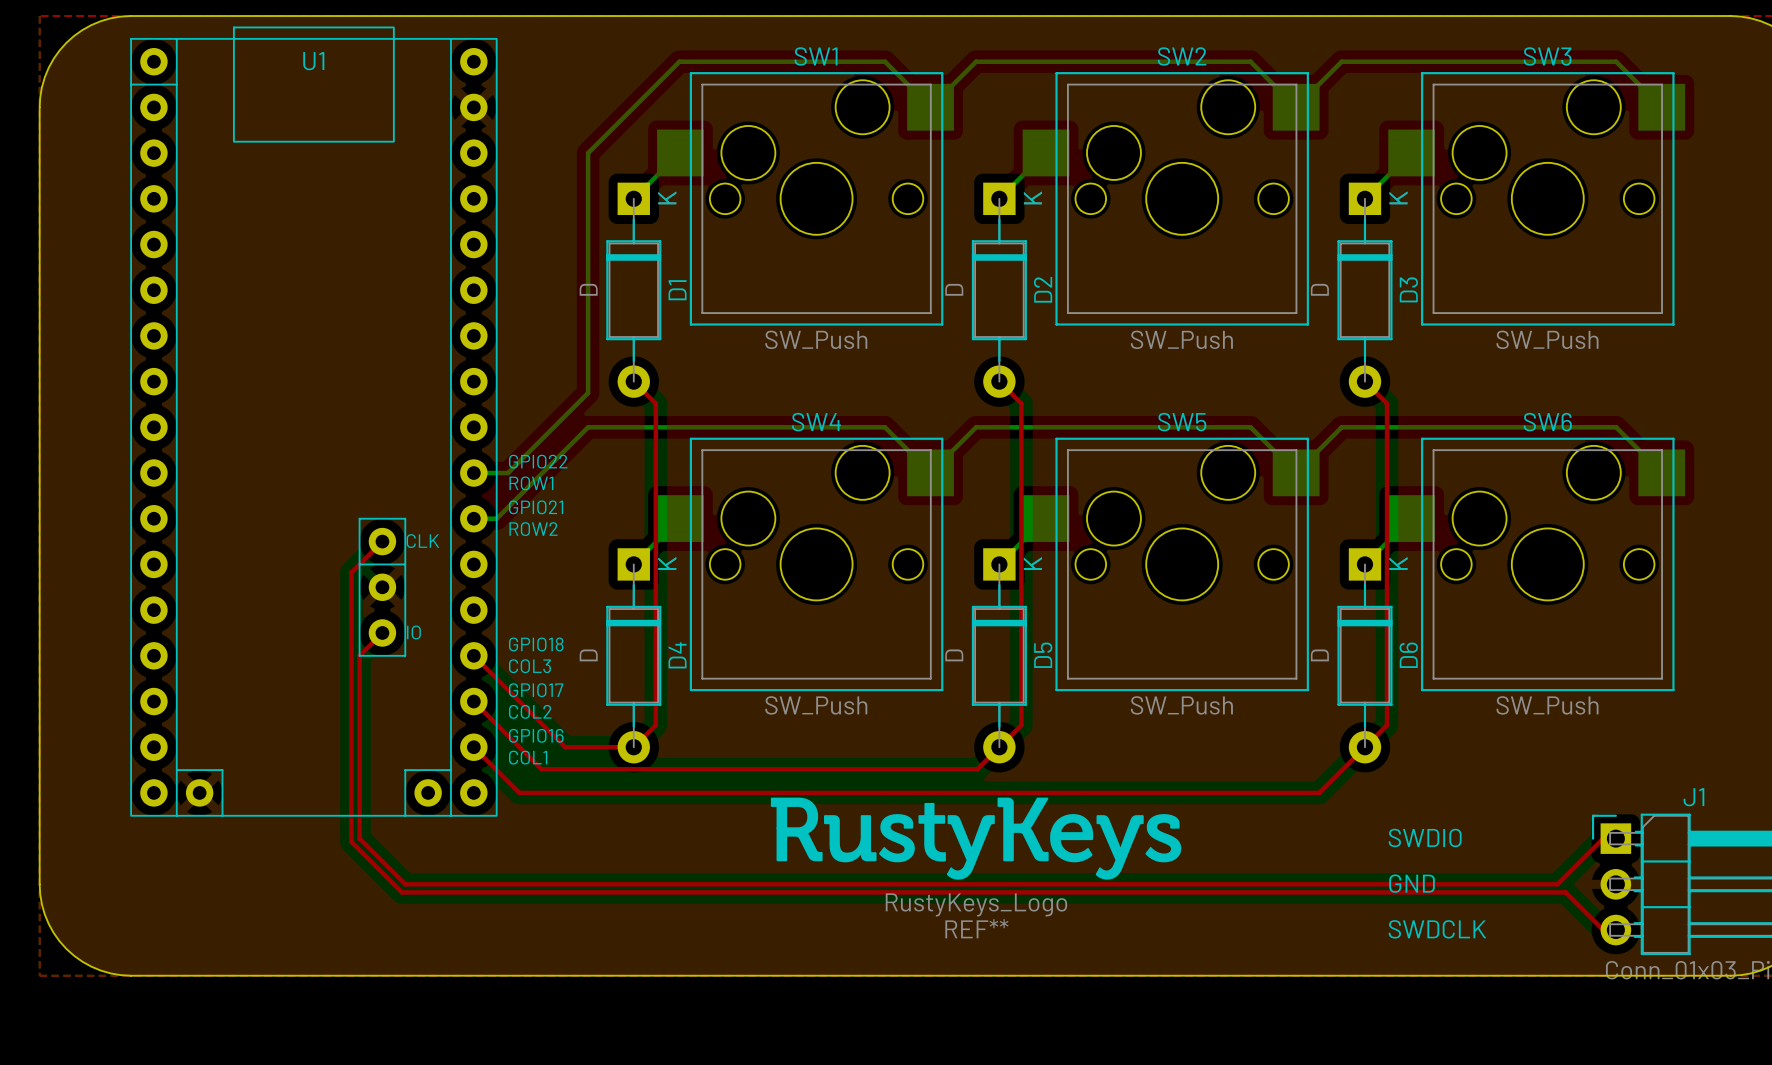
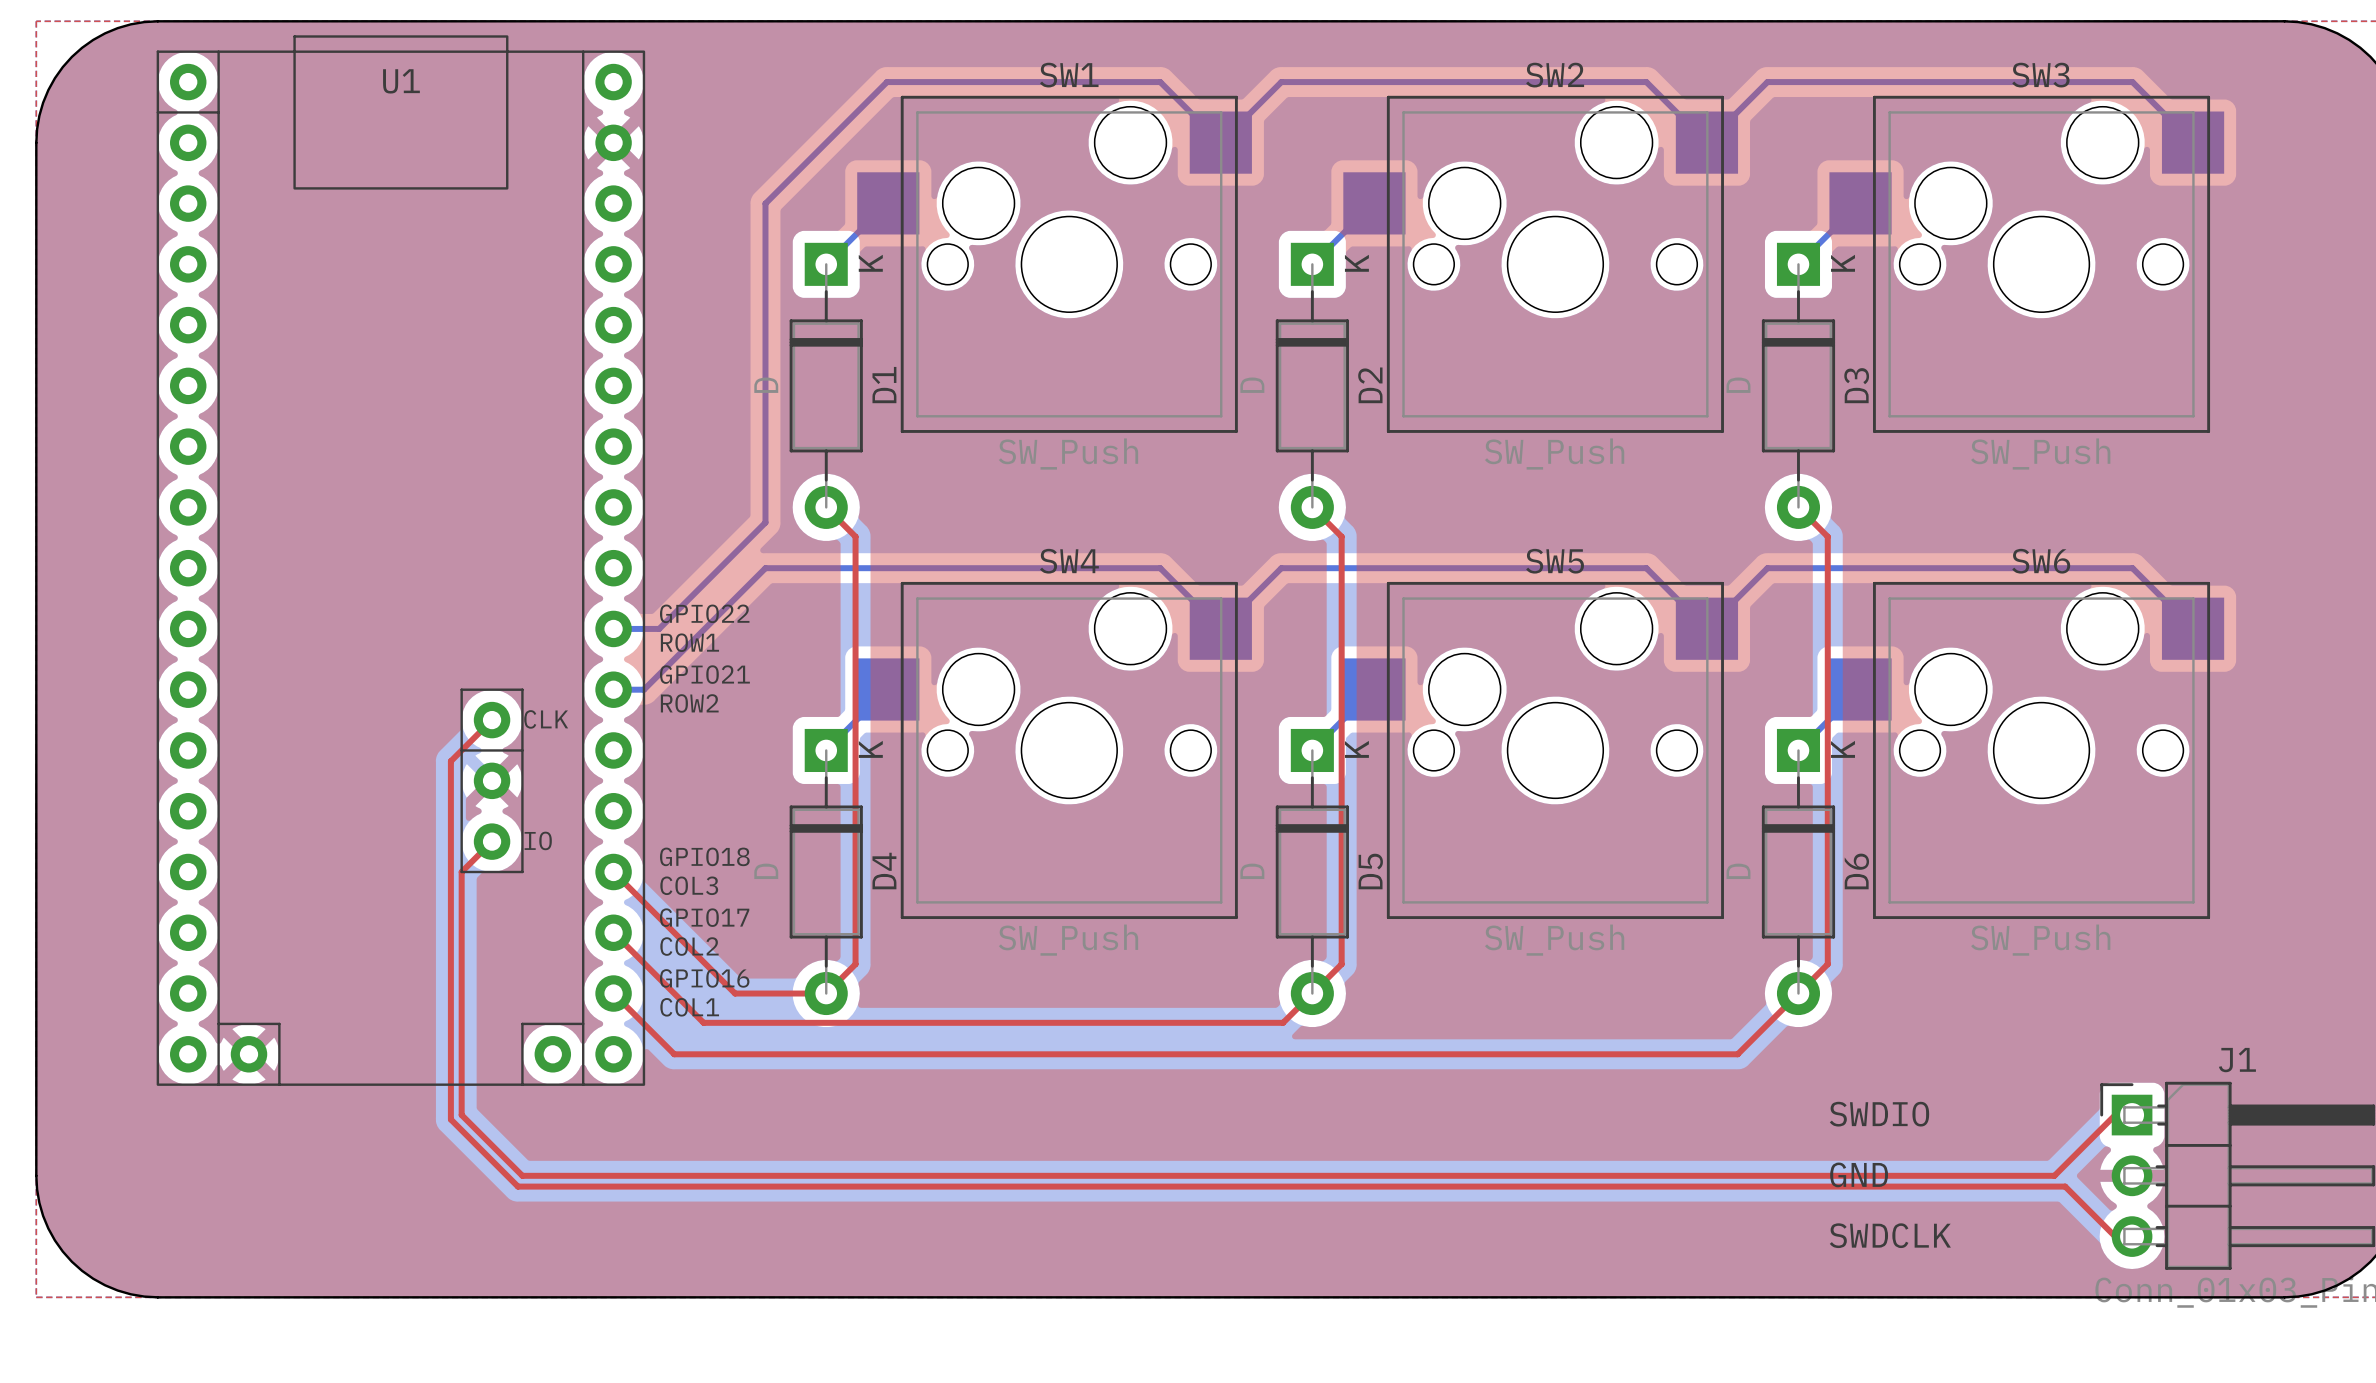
REF**: RustyKeys_Logo (976, 838) -> none

